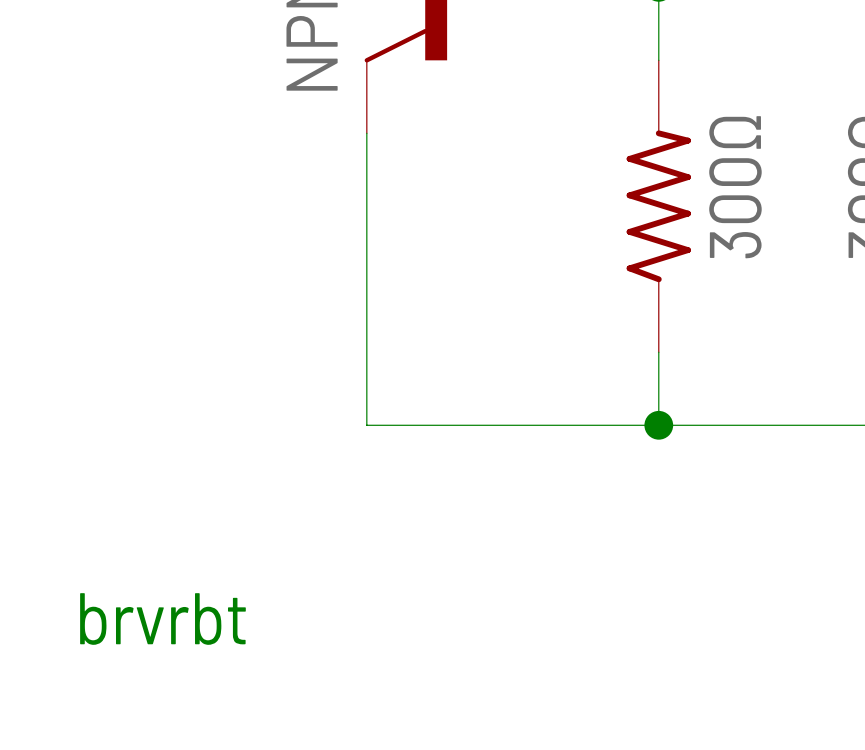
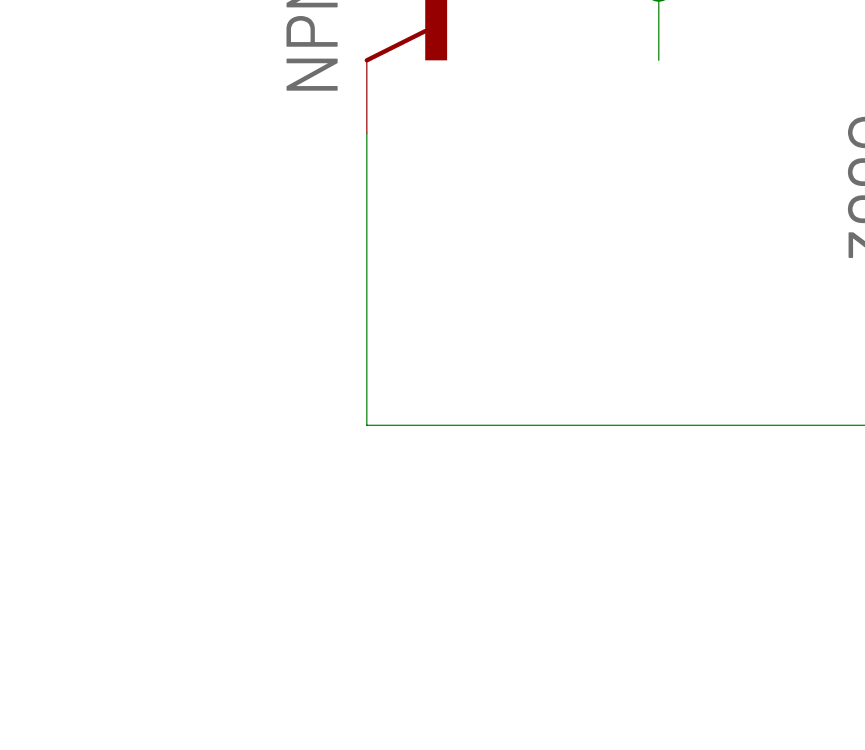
part: 300Ω (658, 206) -> none
wire: (658, 352) (658, 425) -> none
junction: (658, 425) -> none
text: brvrbt (162, 619) -> none

